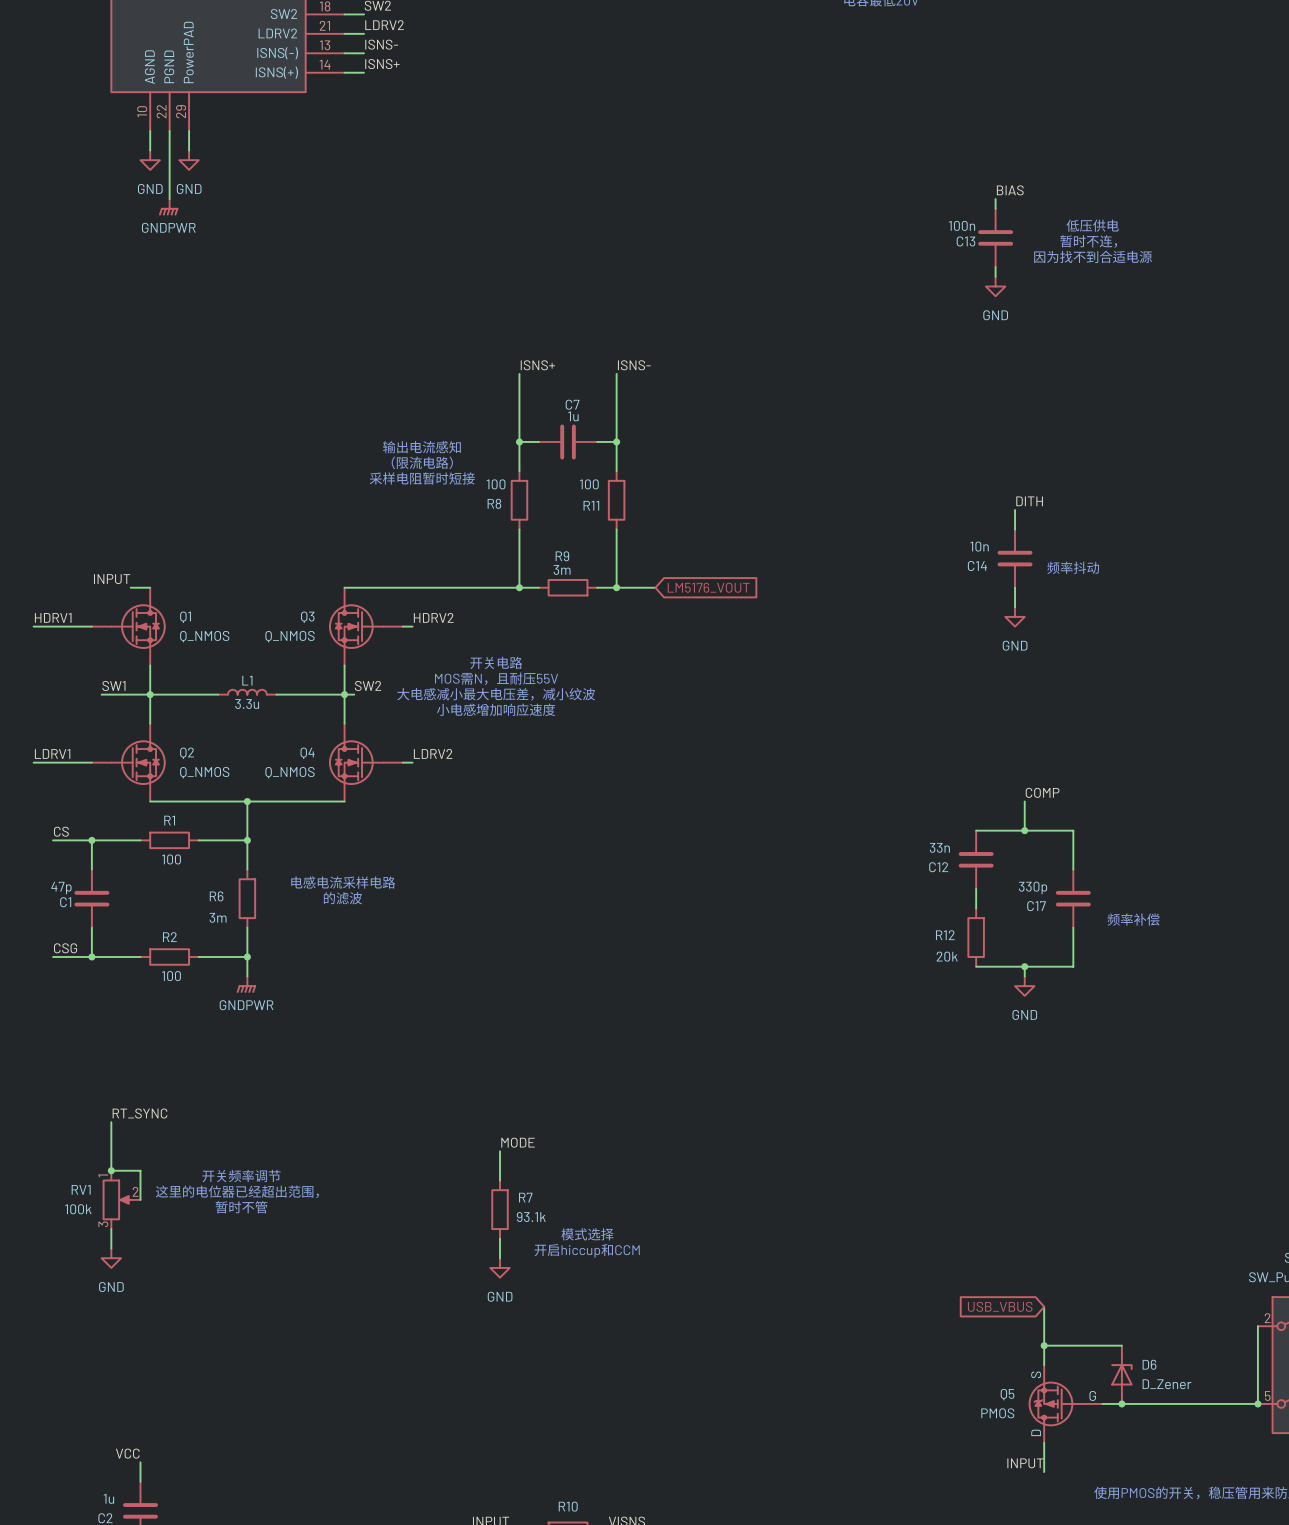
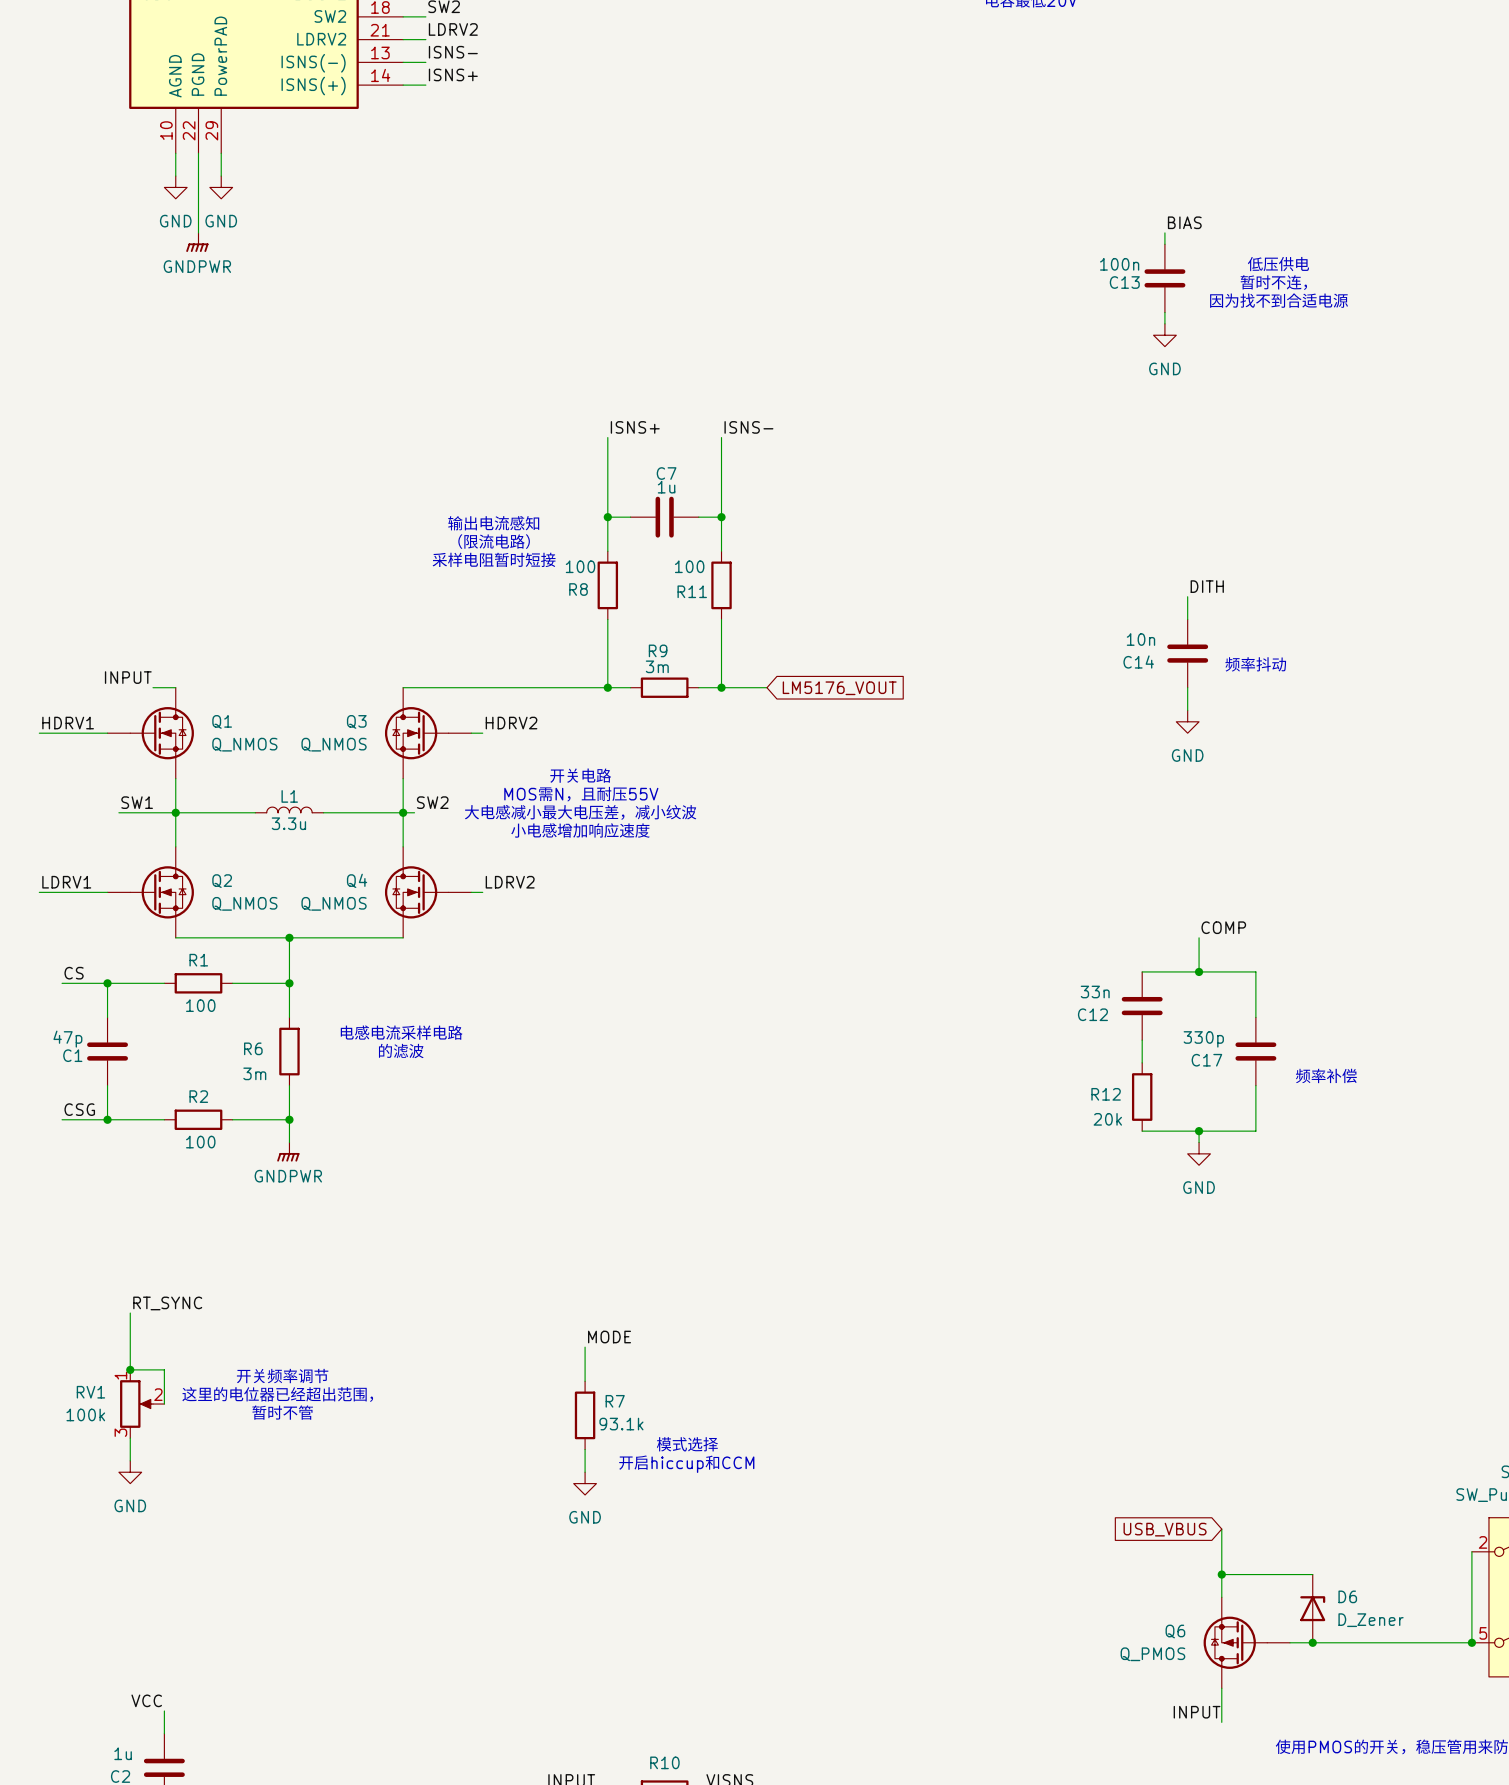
Q5: PMOS (1065, 1403) -> none
Q6: none -> Q_PMOS (1246, 1642)

